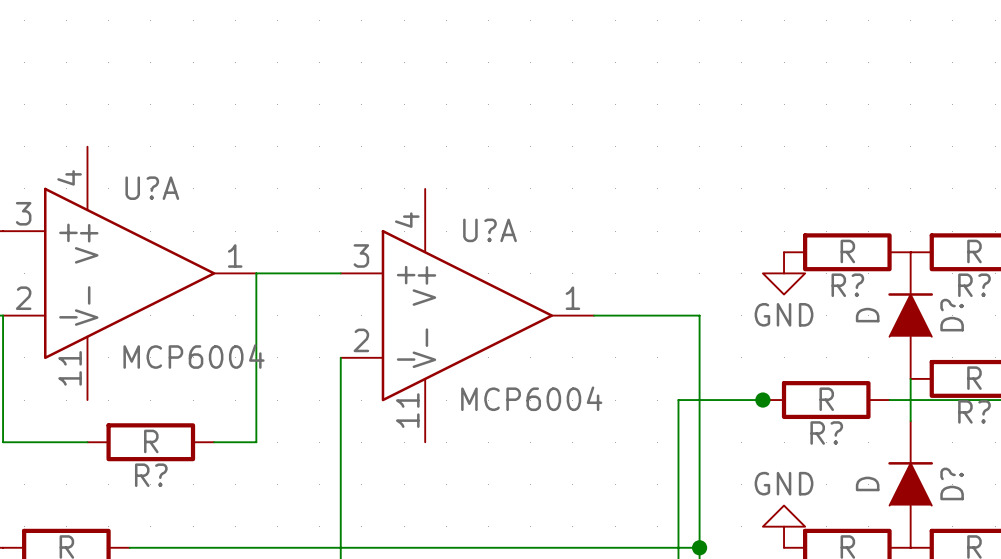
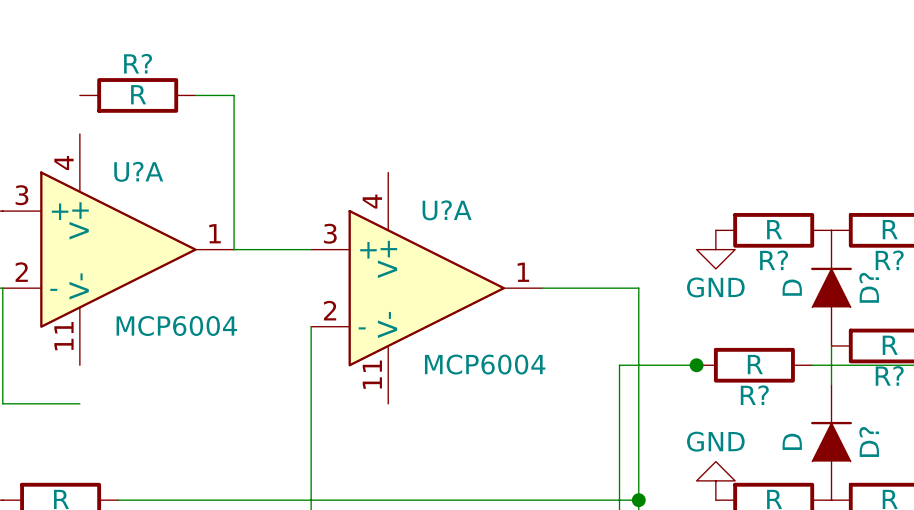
R?: none -> R (137, 95)
wire: (256, 273) (256, 442) (214, 442) -> (234, 249) (234, 95) (195, 95)
R?: R (150, 442) -> none

